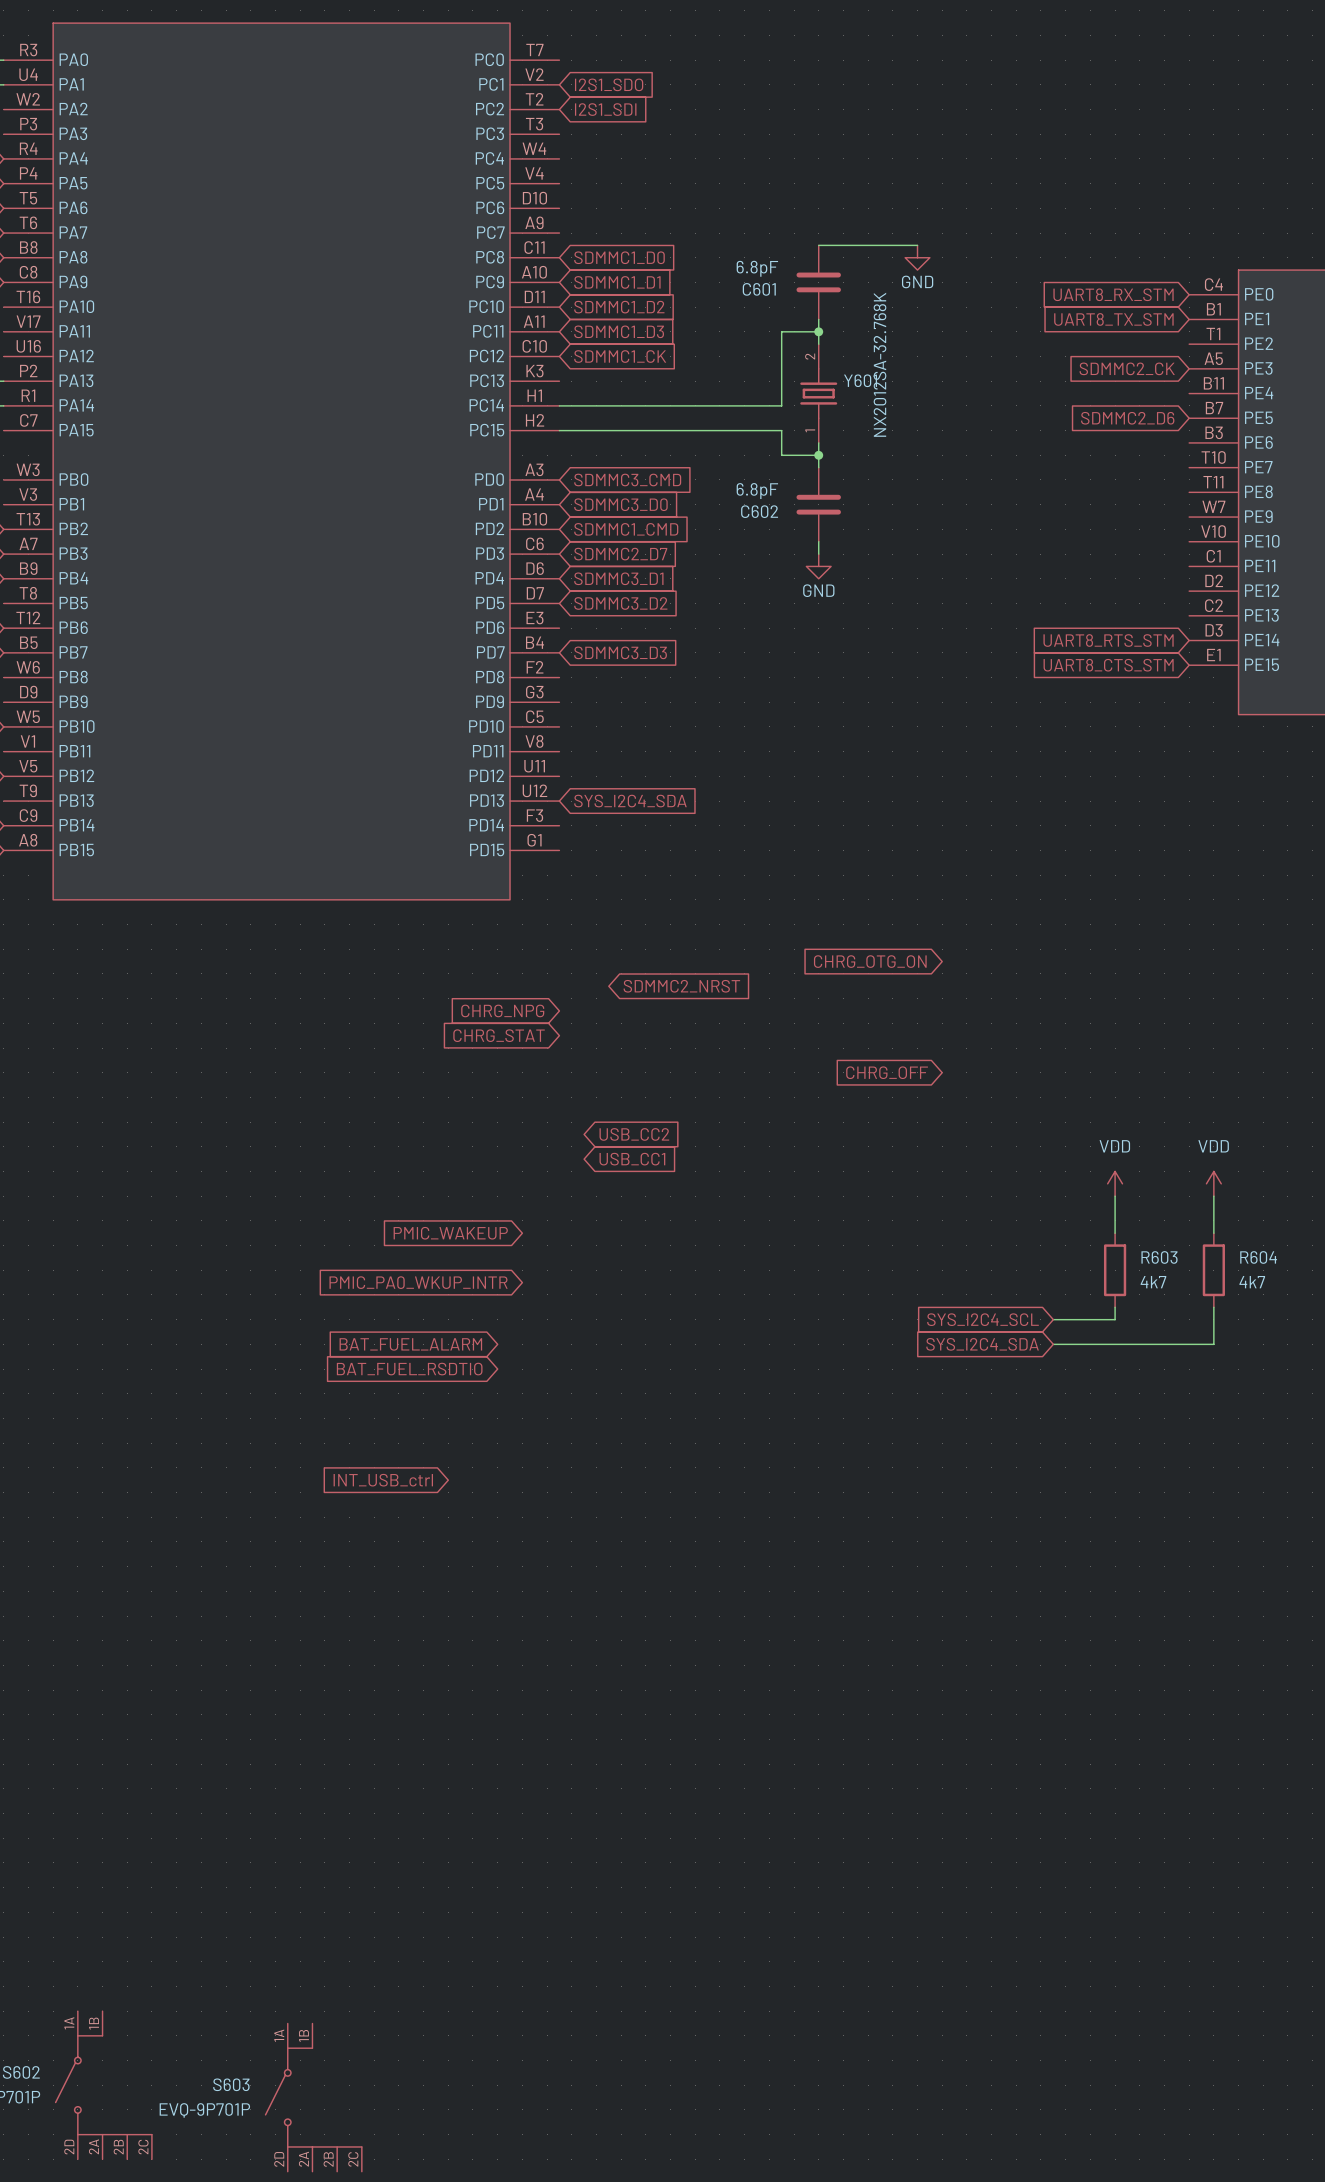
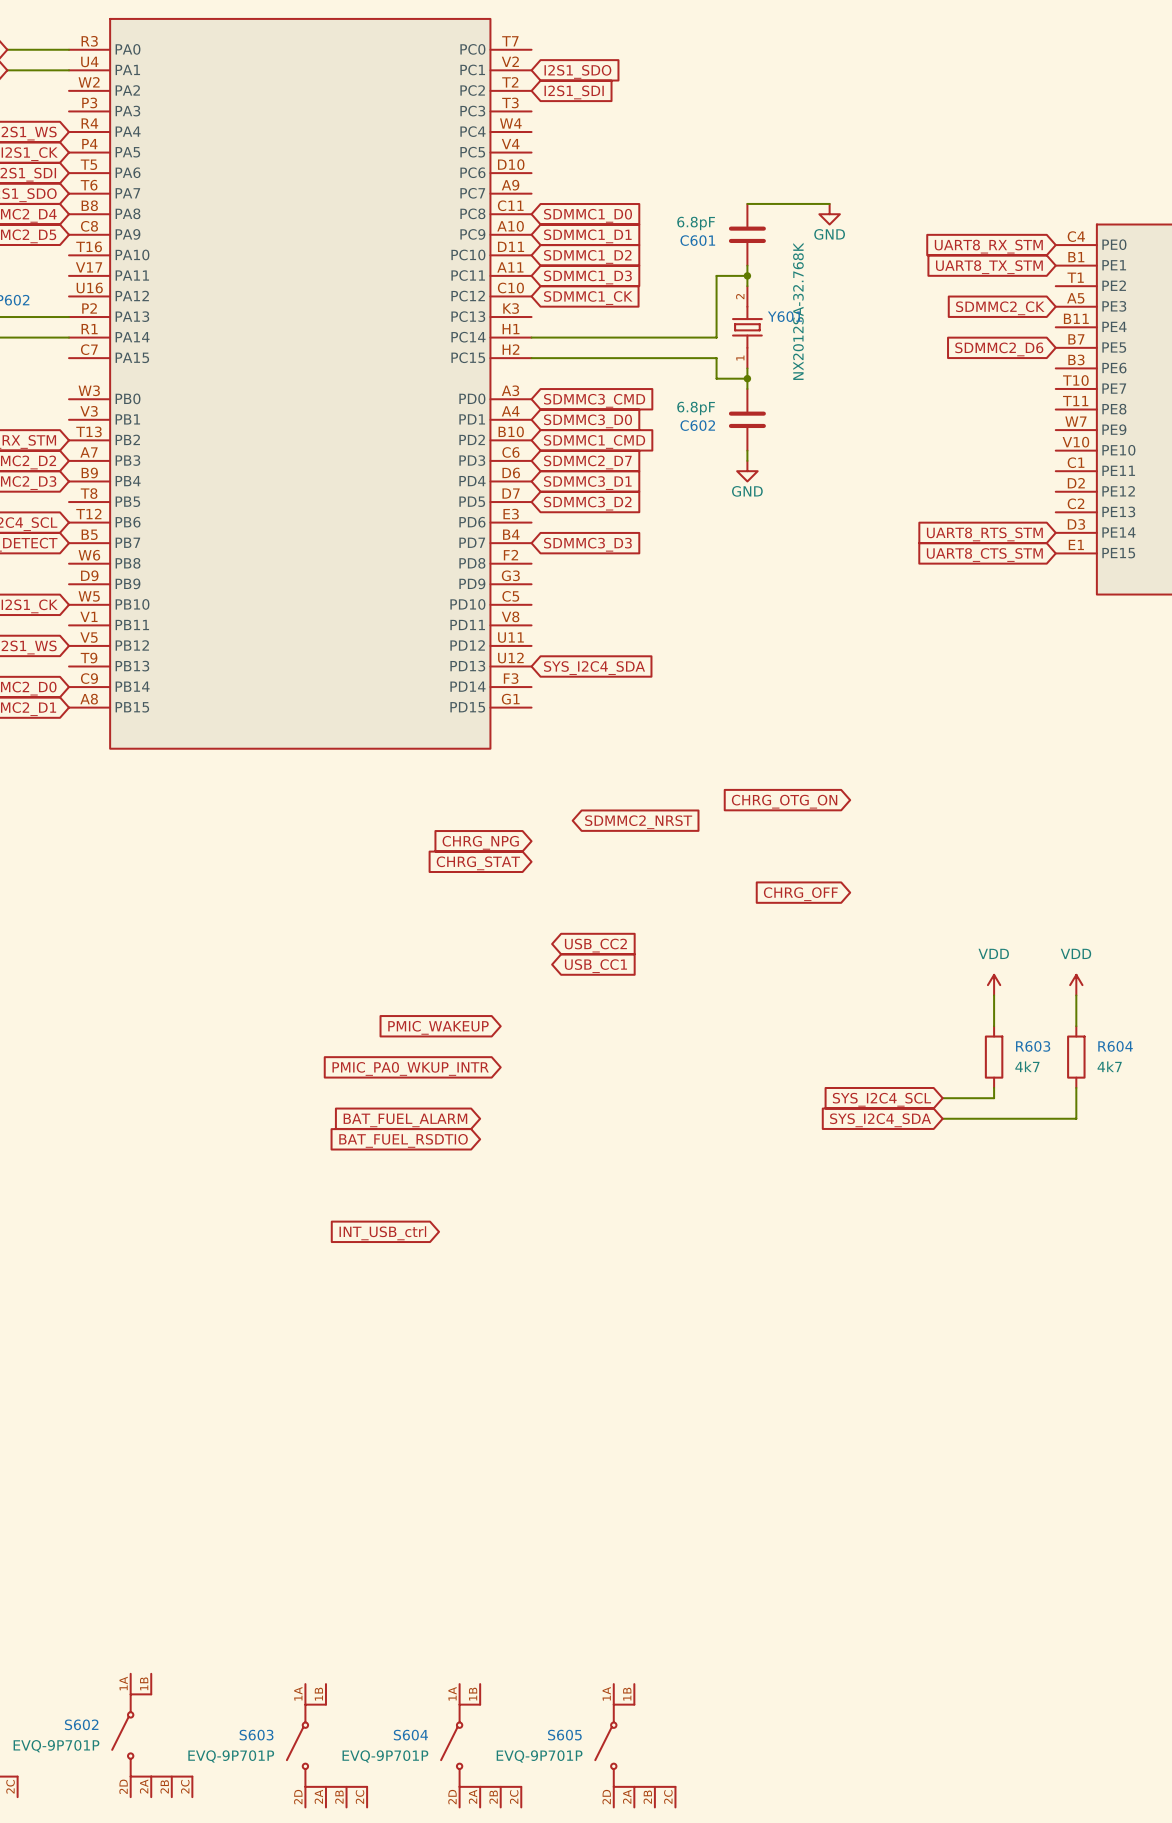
S604: none -> EVQ-9P701P (480, 1745)
S605: none -> EVQ-9P701P (635, 1745)

